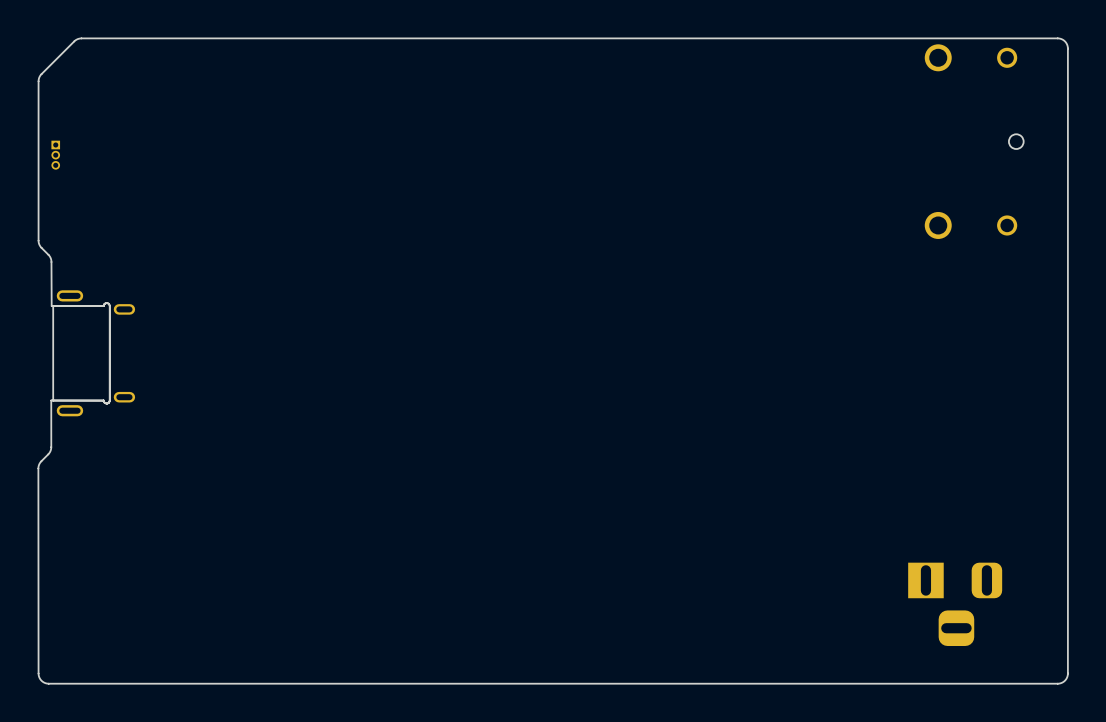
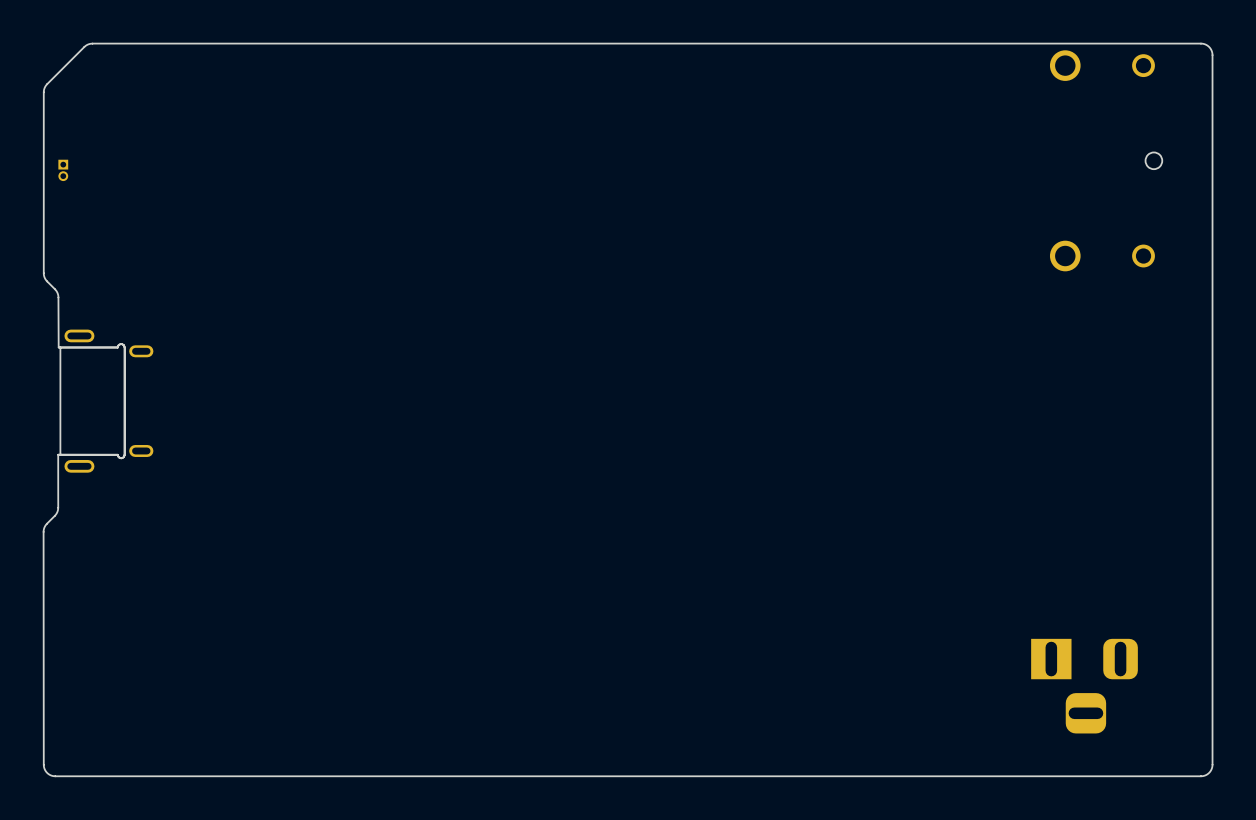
part footprint: [51, 140, 61, 170] -> [58, 159, 69, 182]

